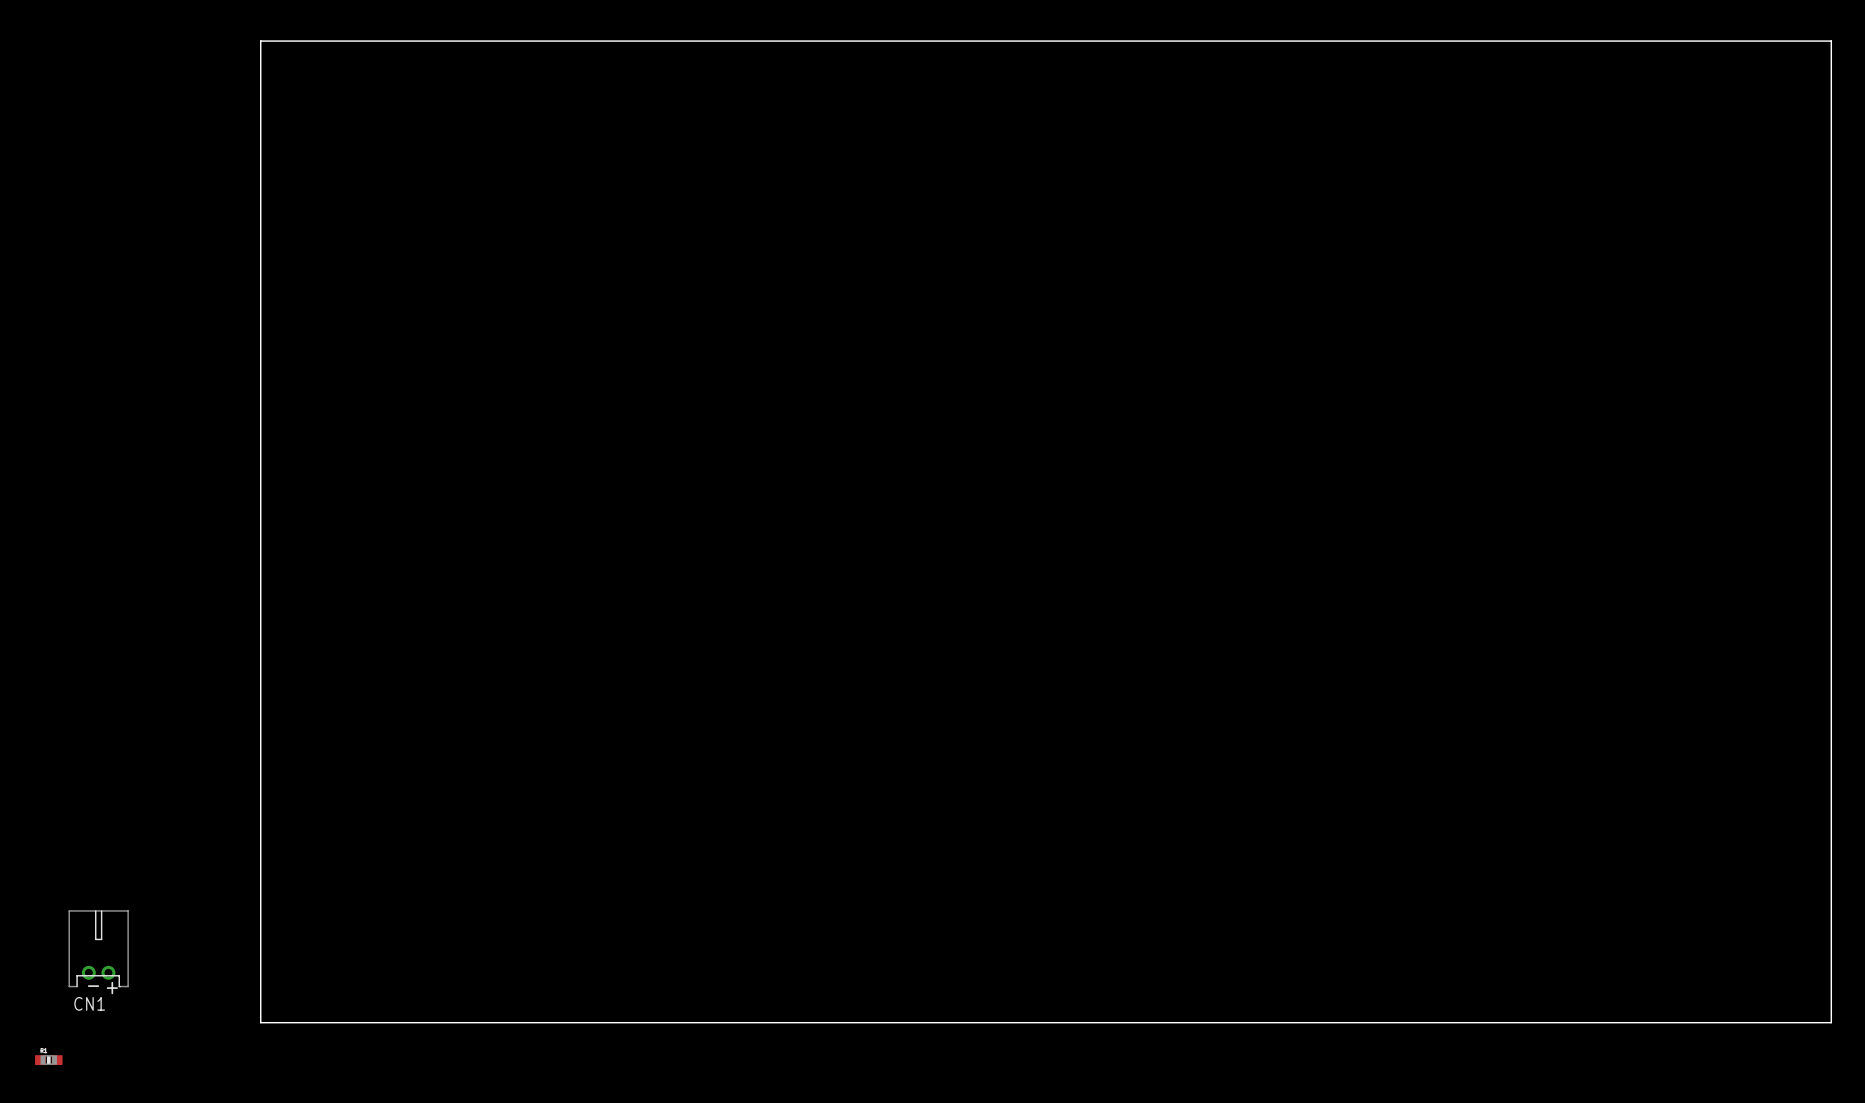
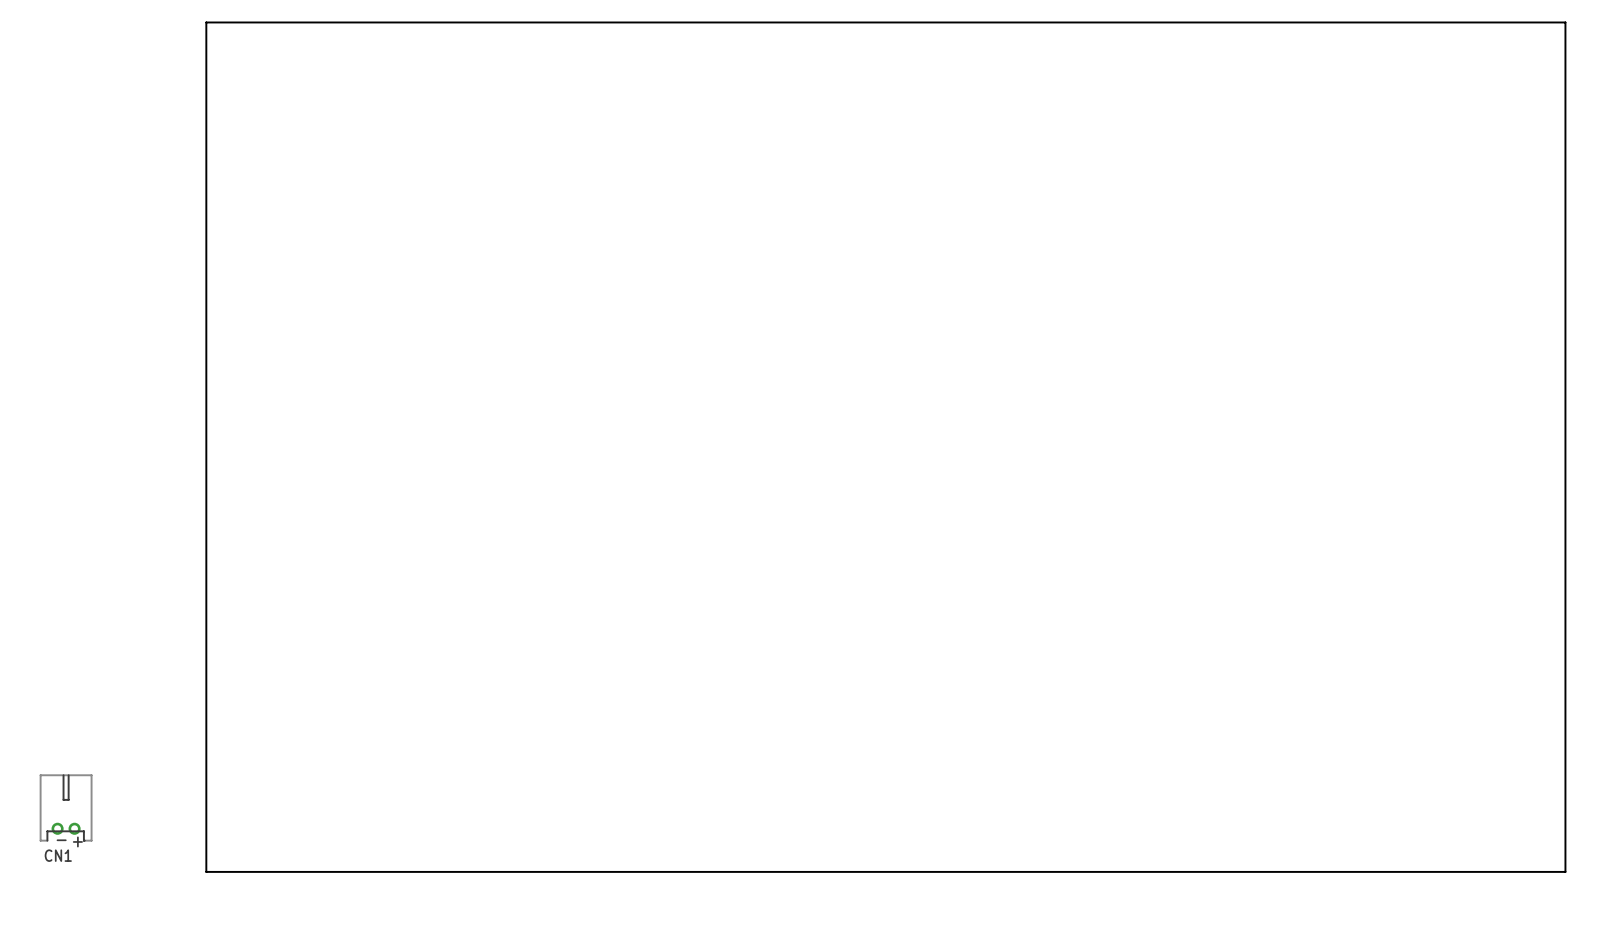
part: (48, 1060) -> none

